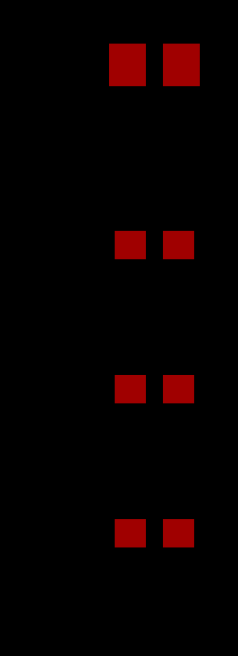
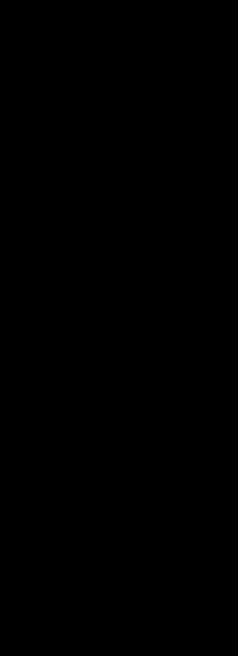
part: (154, 64) -> none
part: (154, 245) -> none
part: (154, 389) -> none
part: (154, 533) -> none

